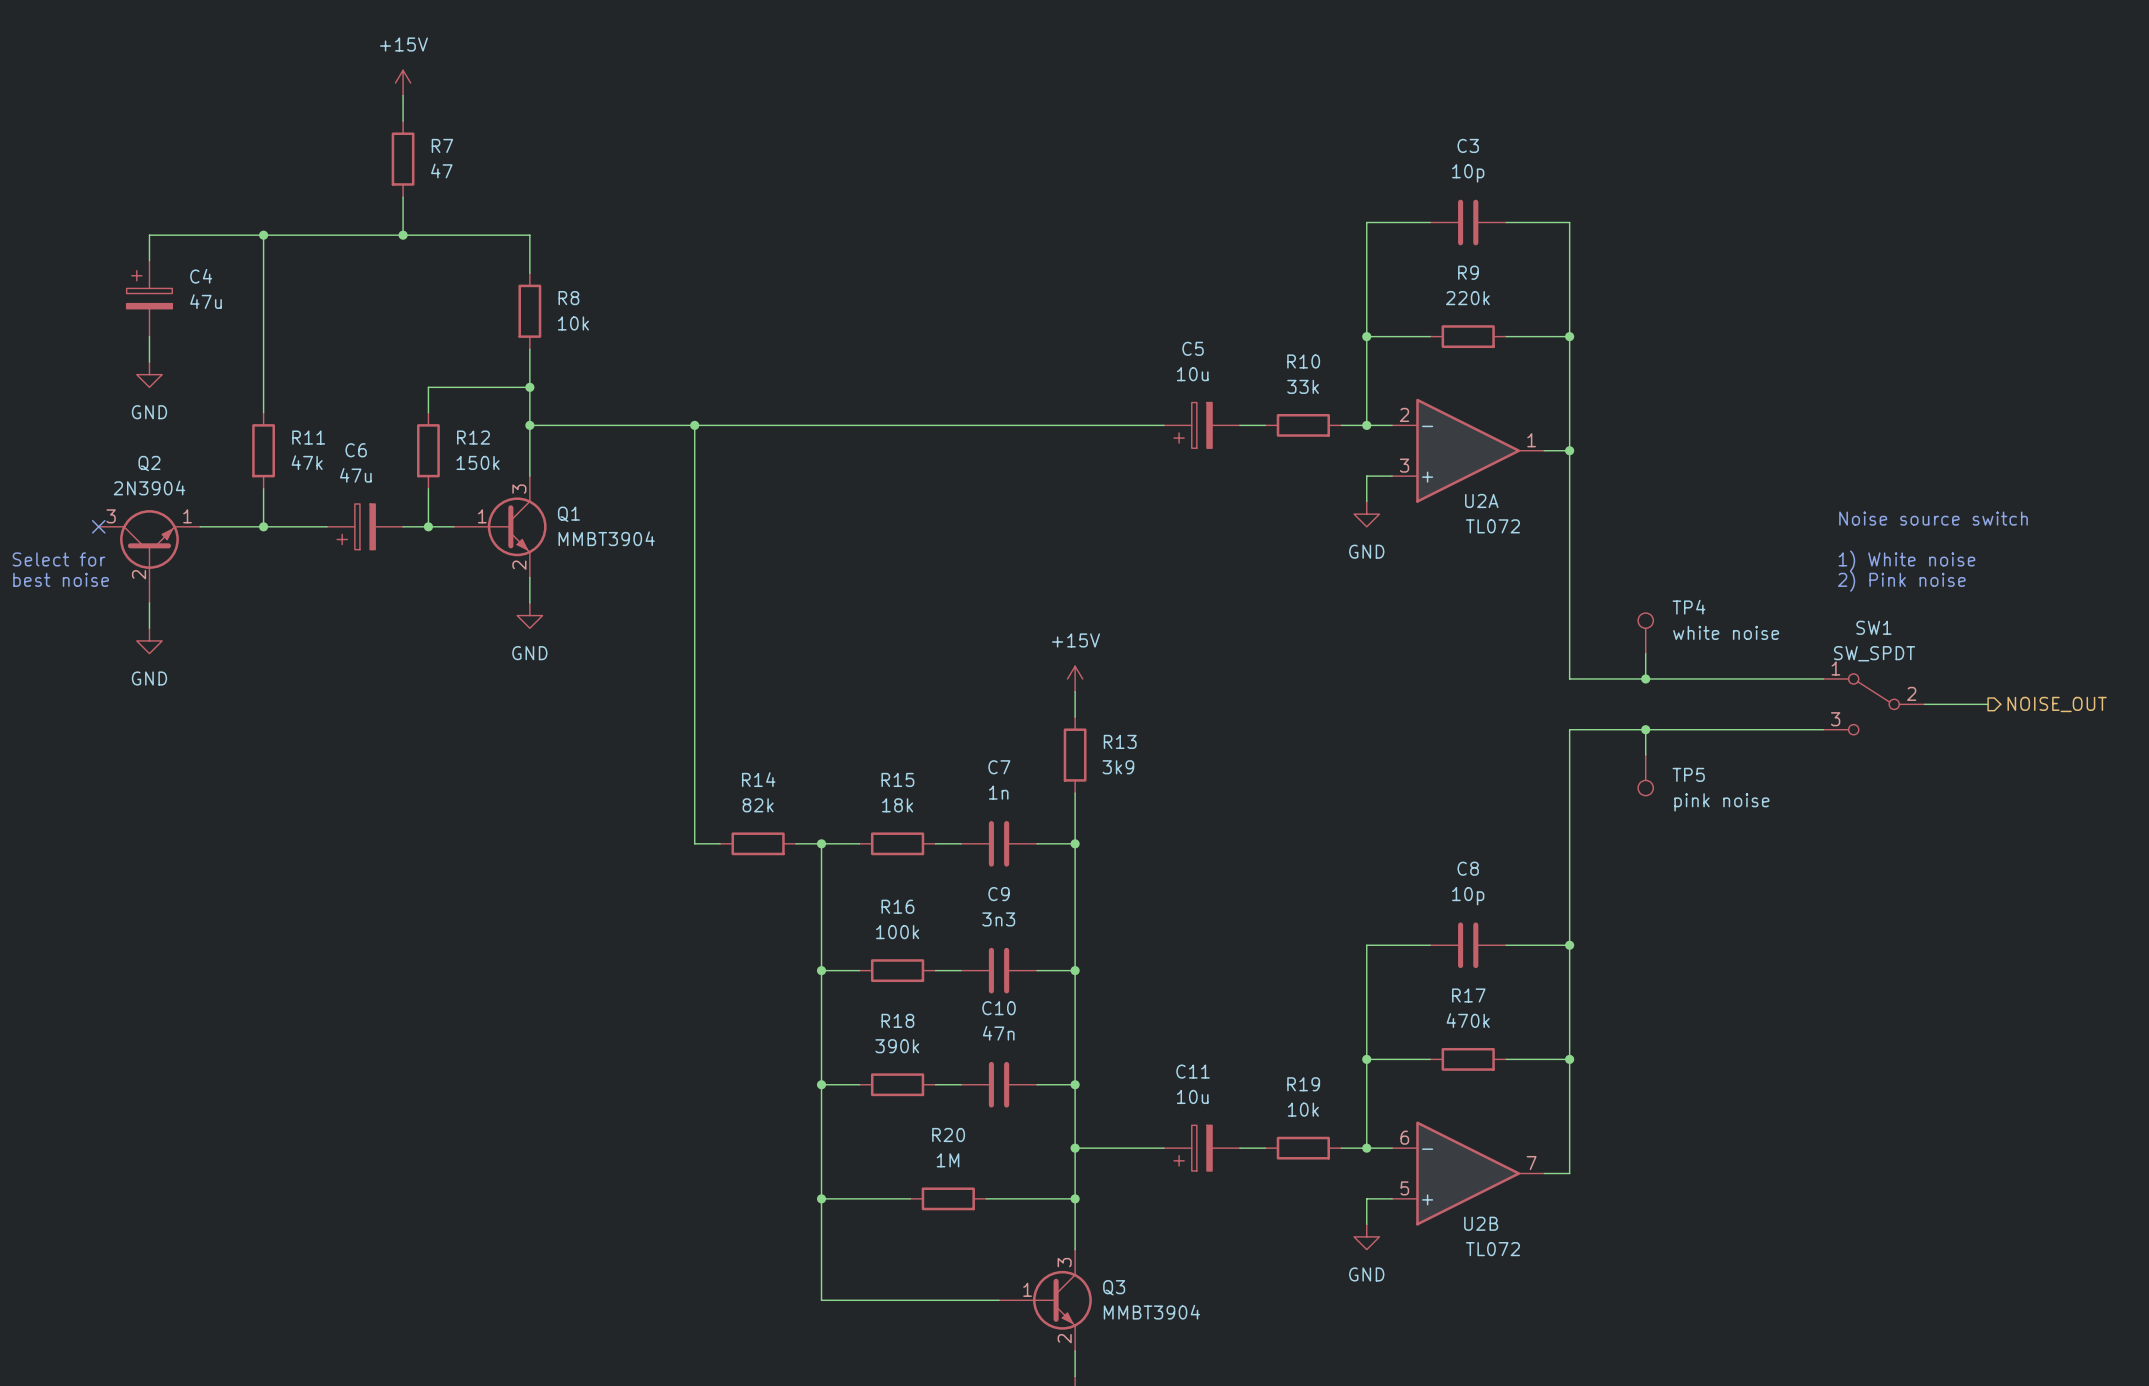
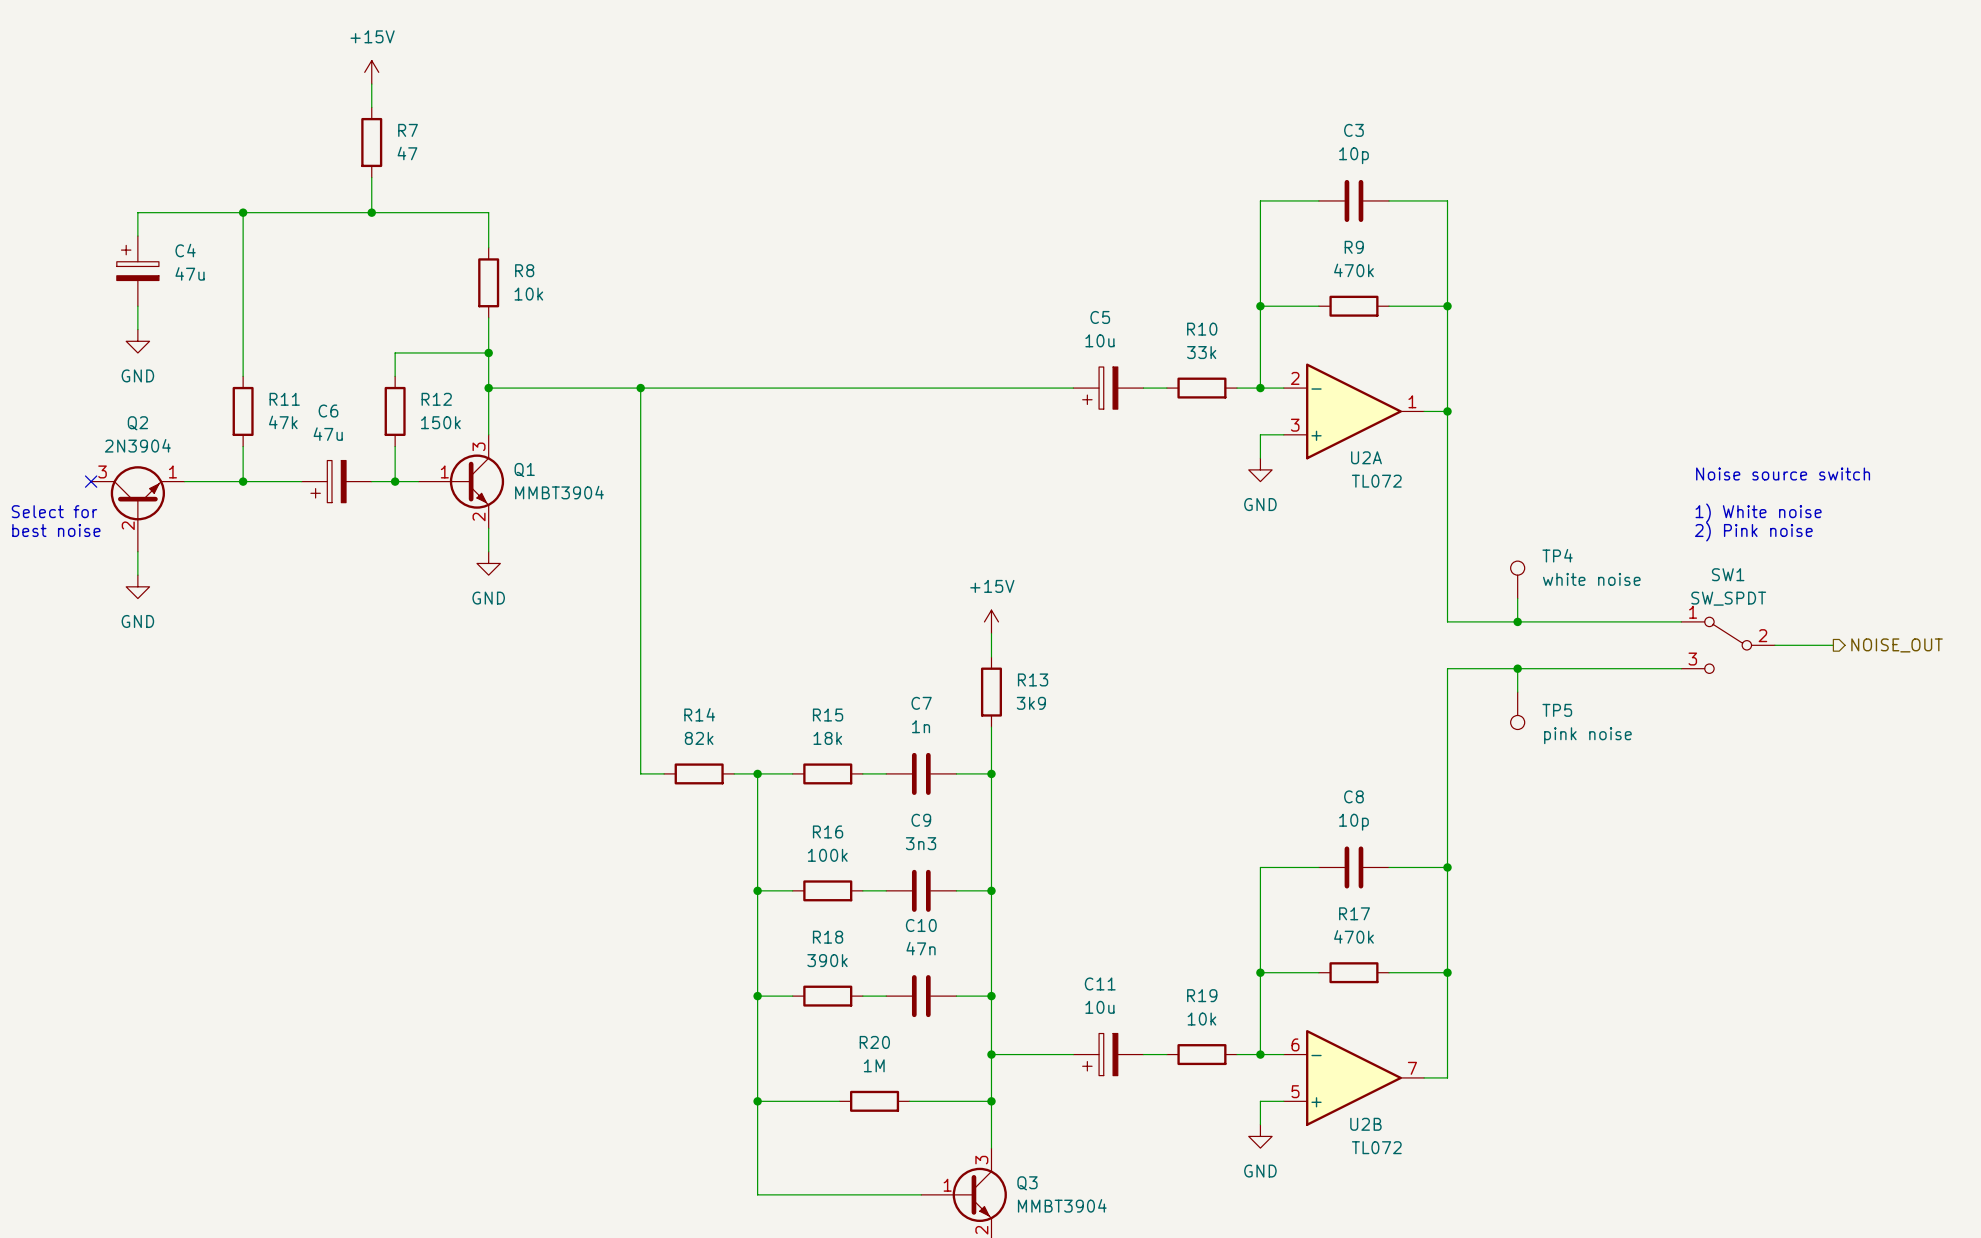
R9 value: 220k (1467, 298) -> 470k (1353, 270)

